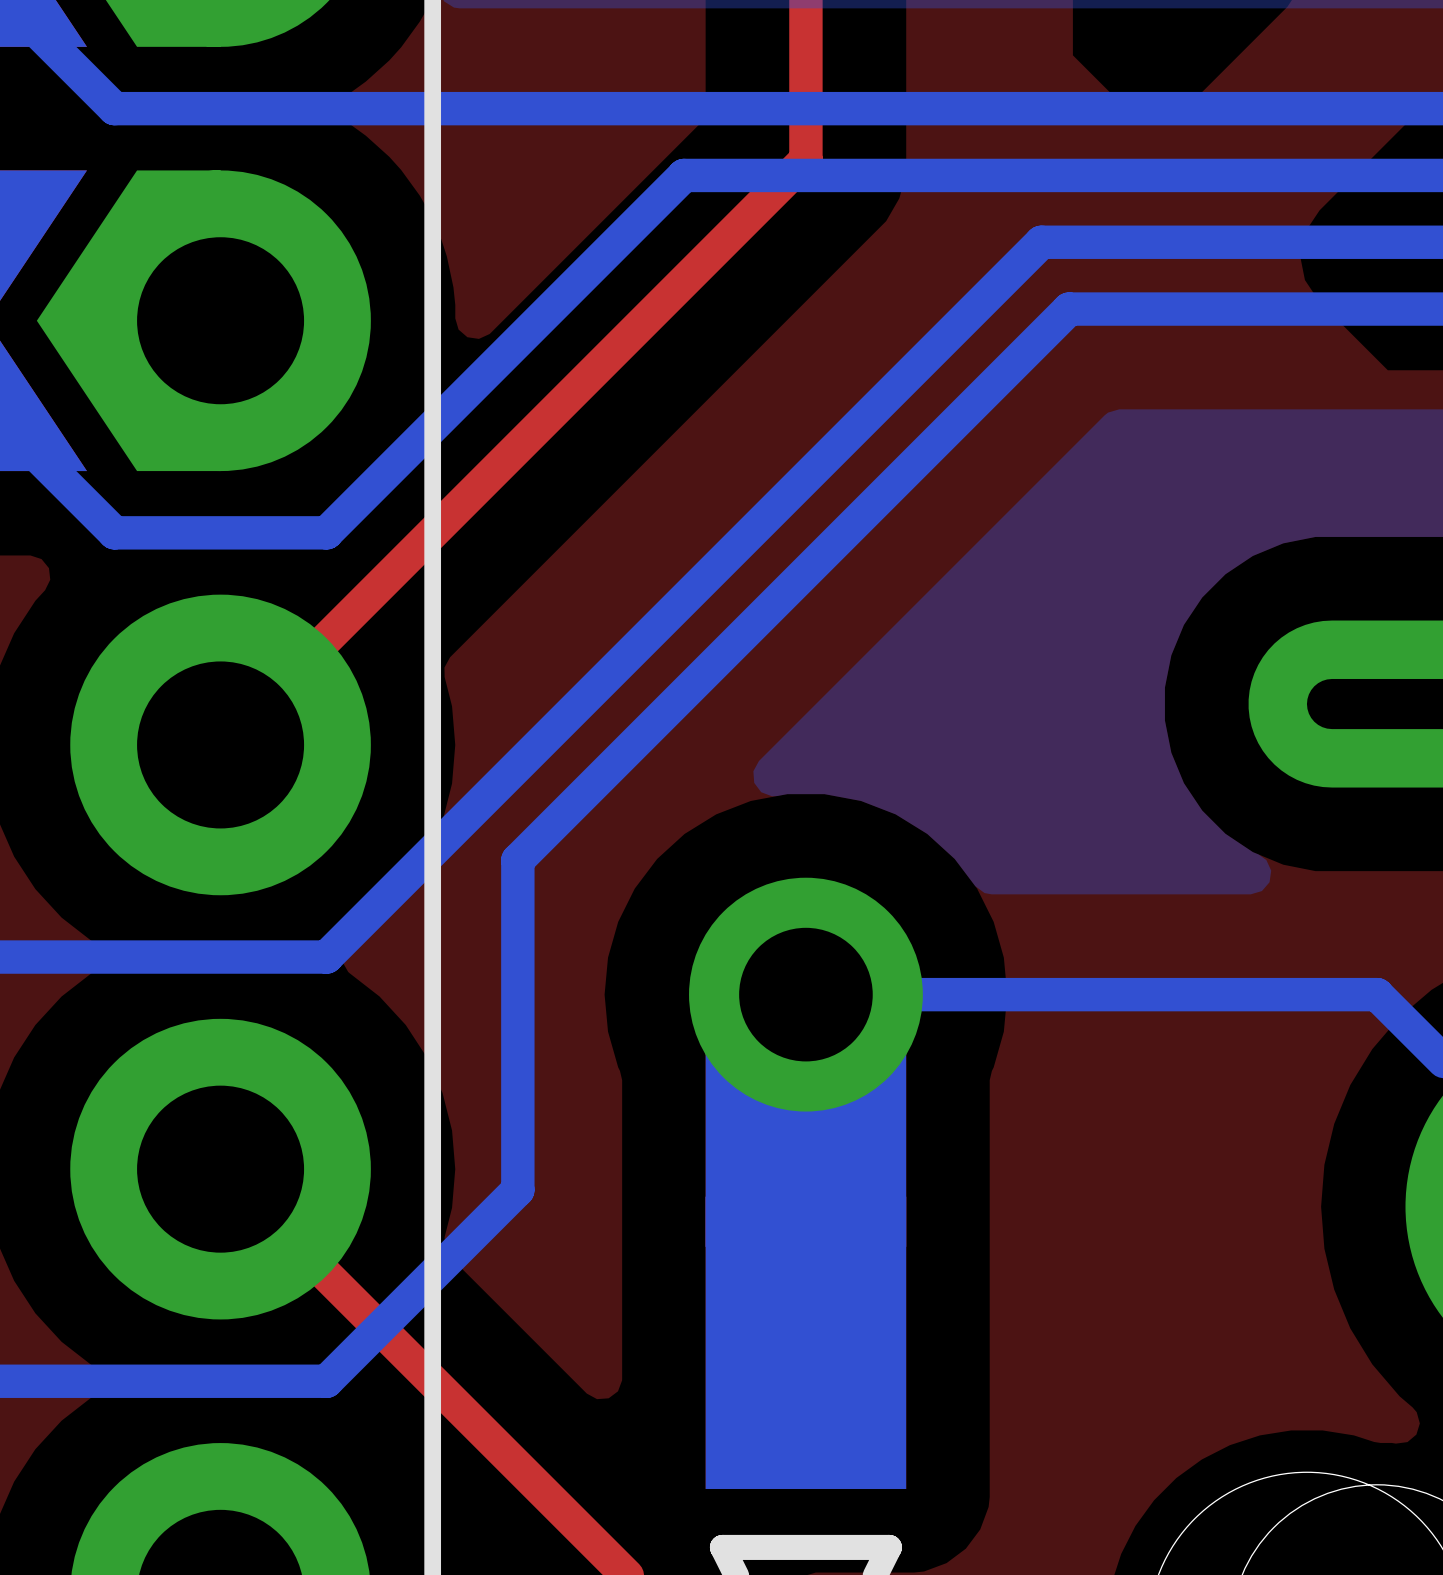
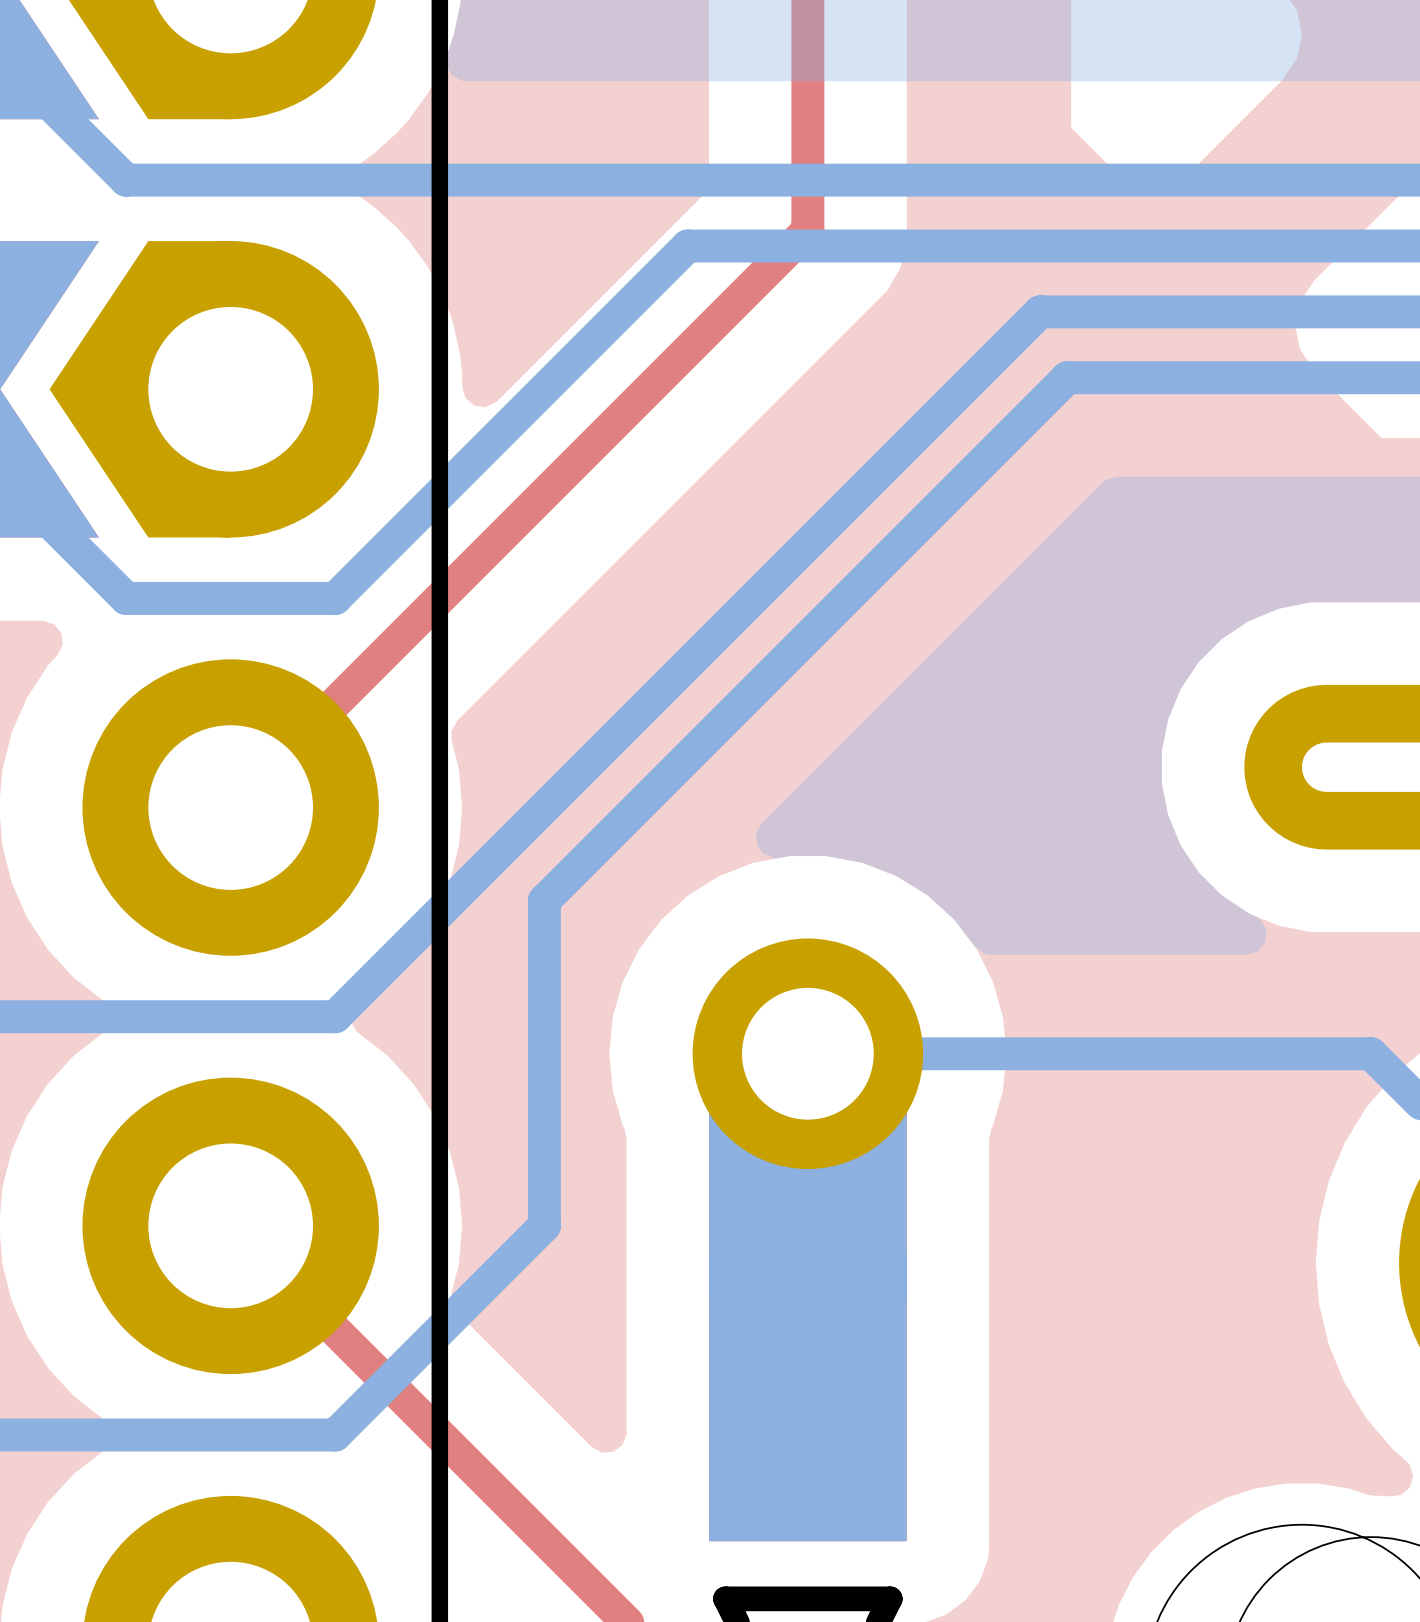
bottom track: (538, 839) (517, 860) (517, 1190) -> (544, 900) (544, 1225) (523, 1246)

